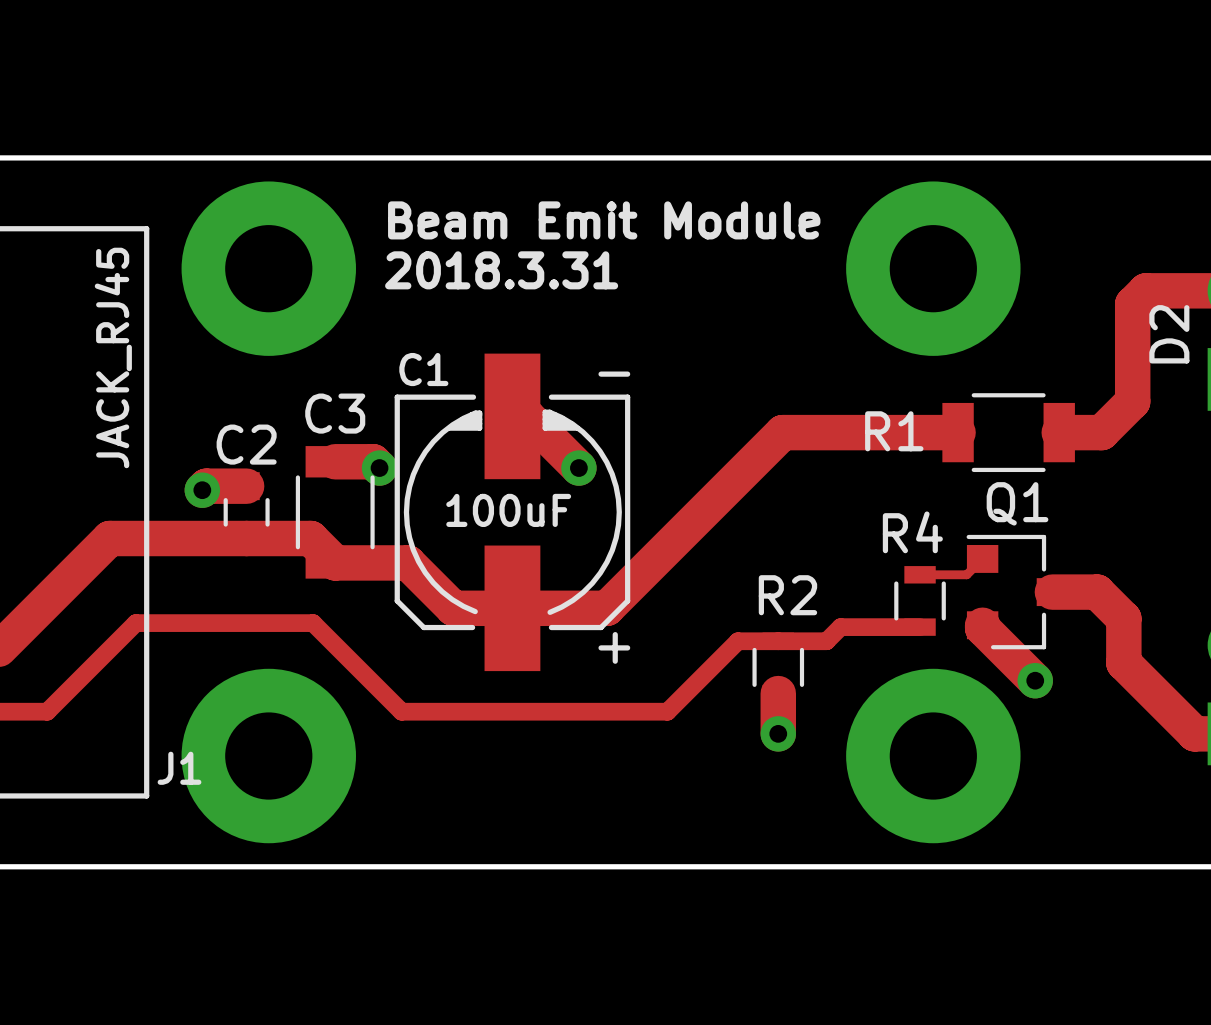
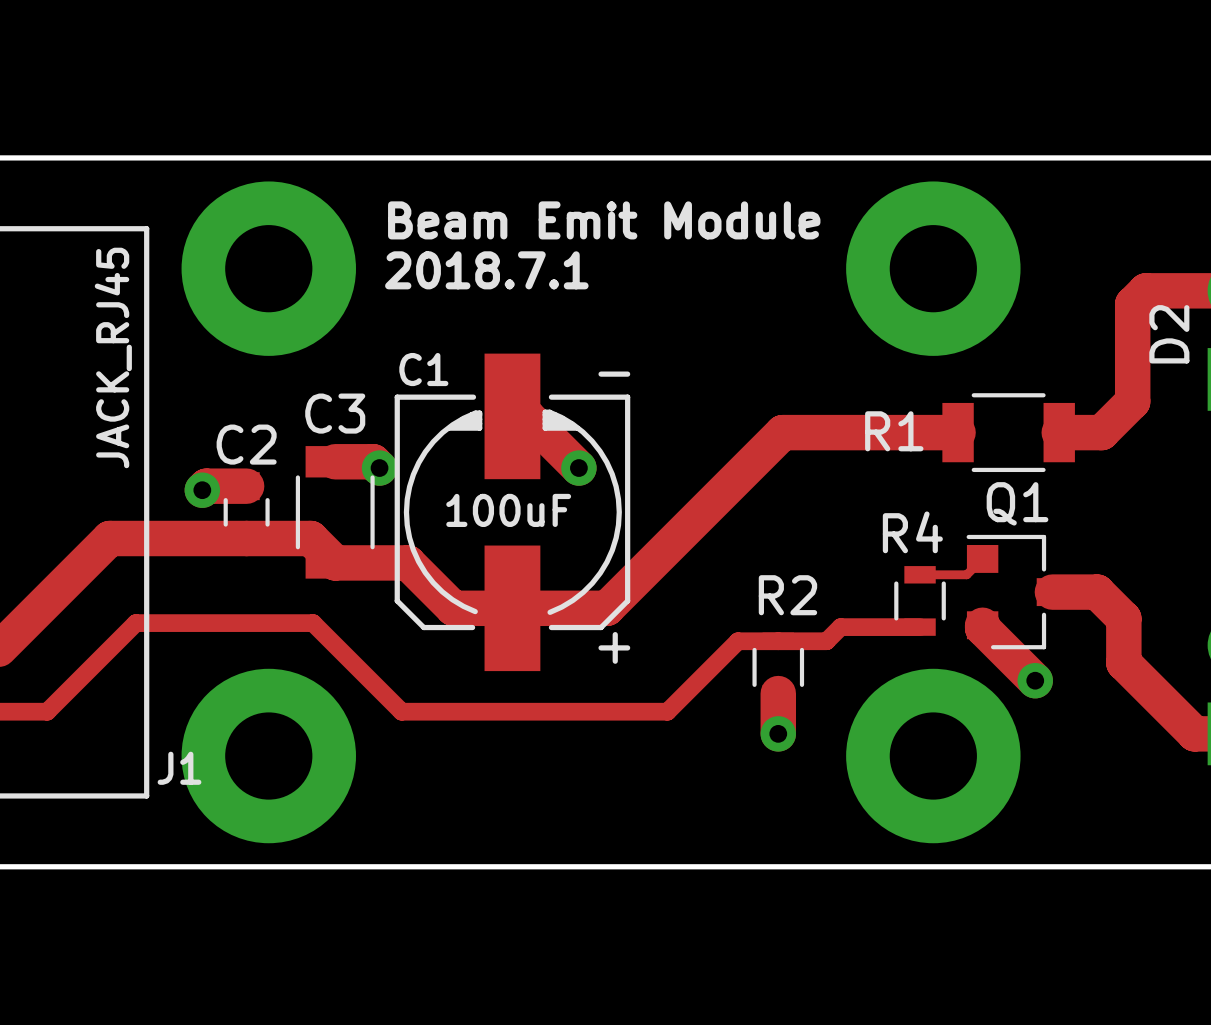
text: 2018.3.31 (501, 270) -> 2018.7.1 (486, 270)

